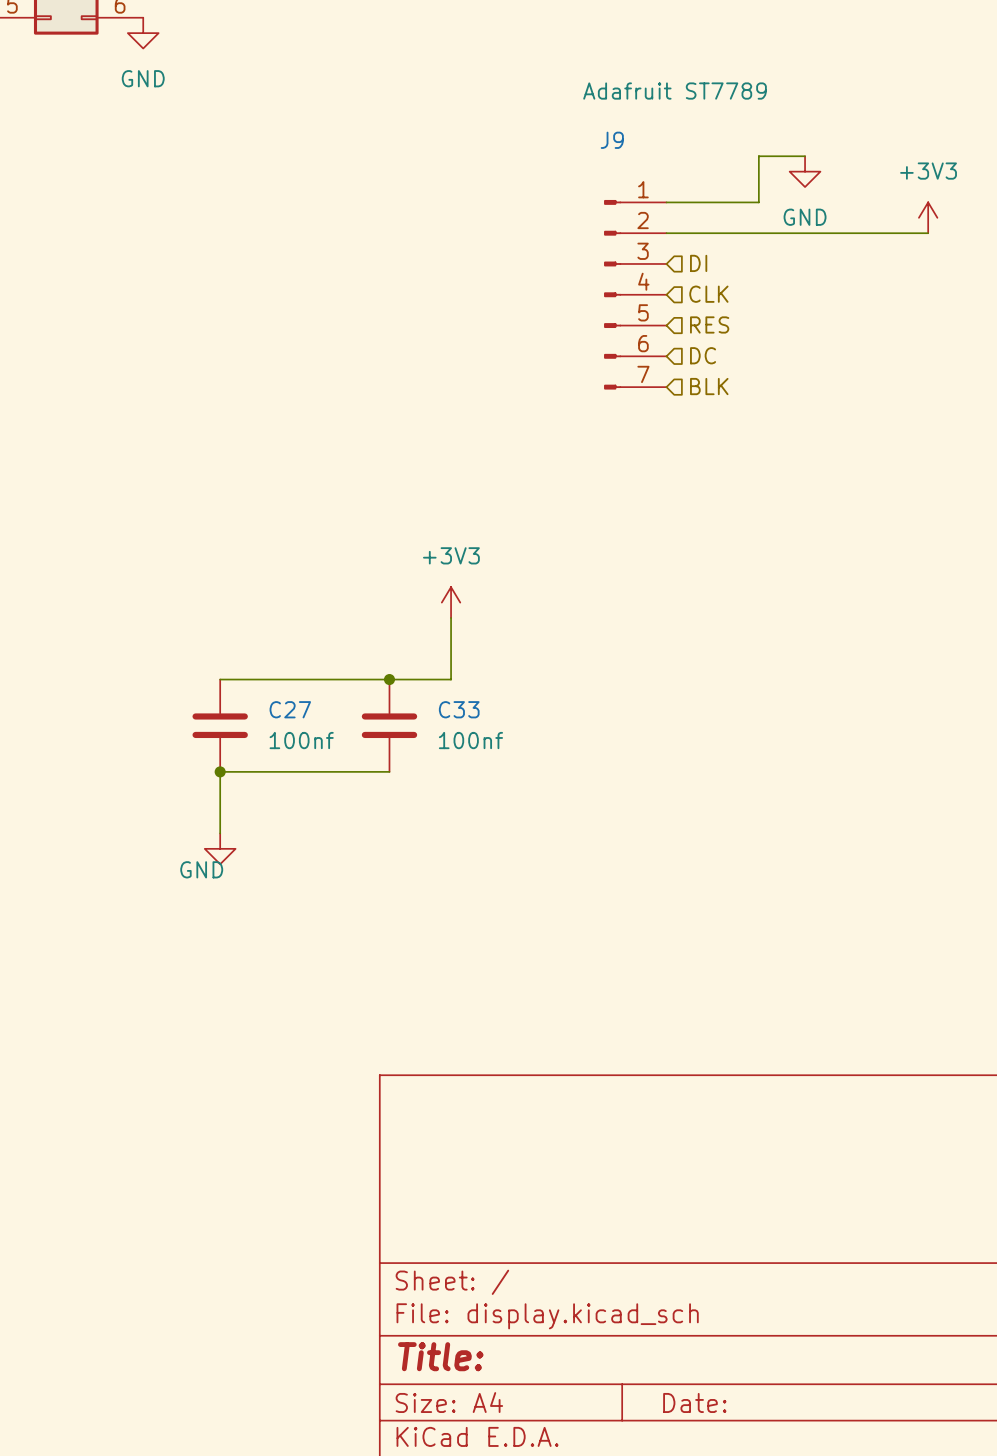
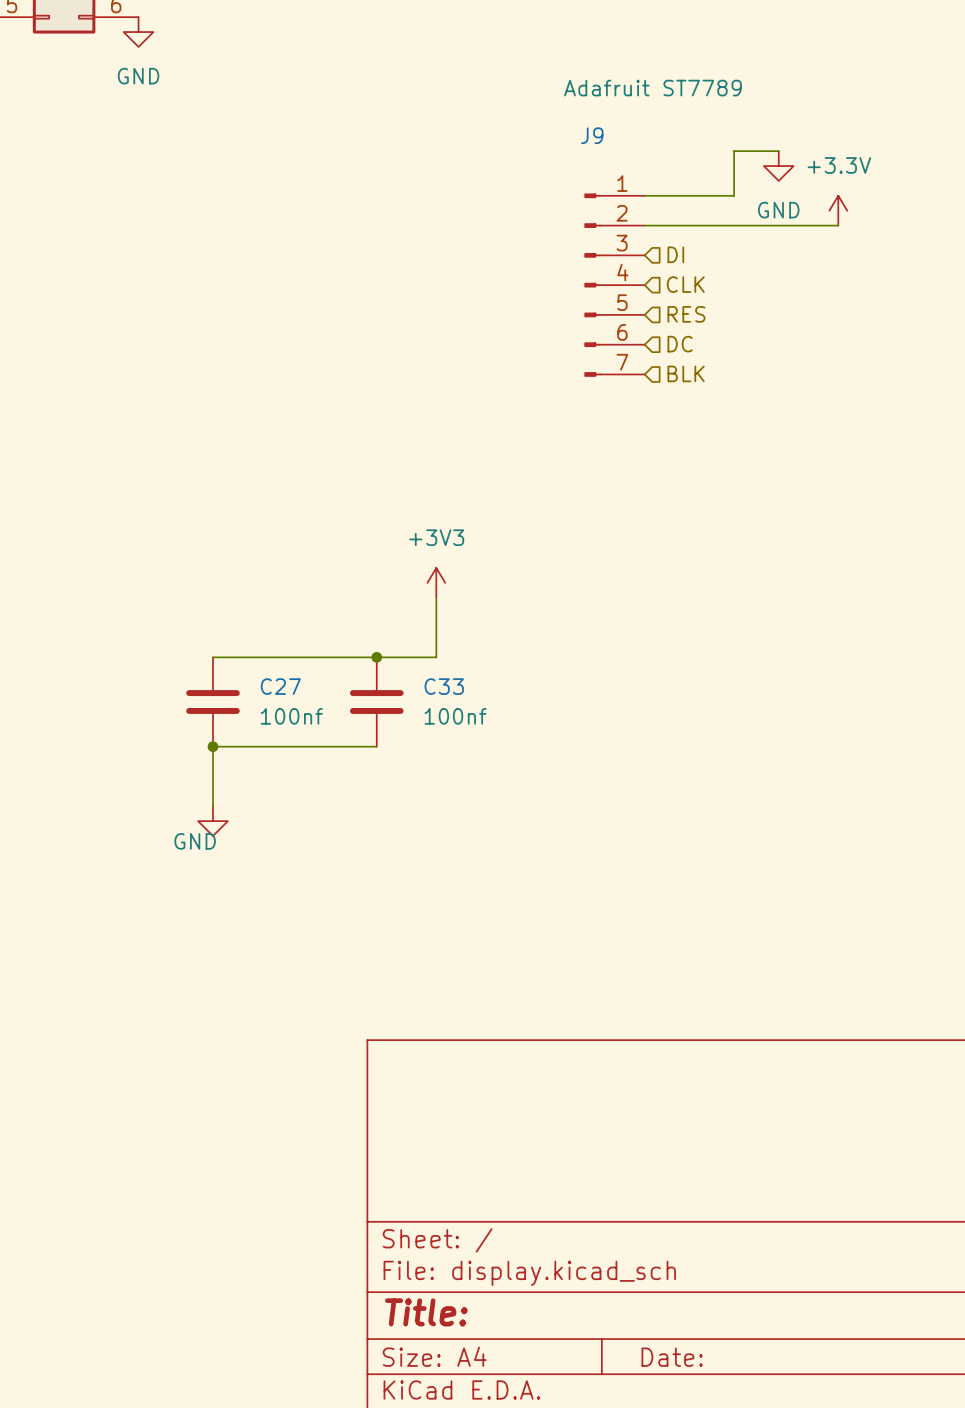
power symbol: none -> +3.3V (838, 210)
power symbol: +3V3 (928, 217) -> none
wire: (866, 233) (928, 233) -> none

